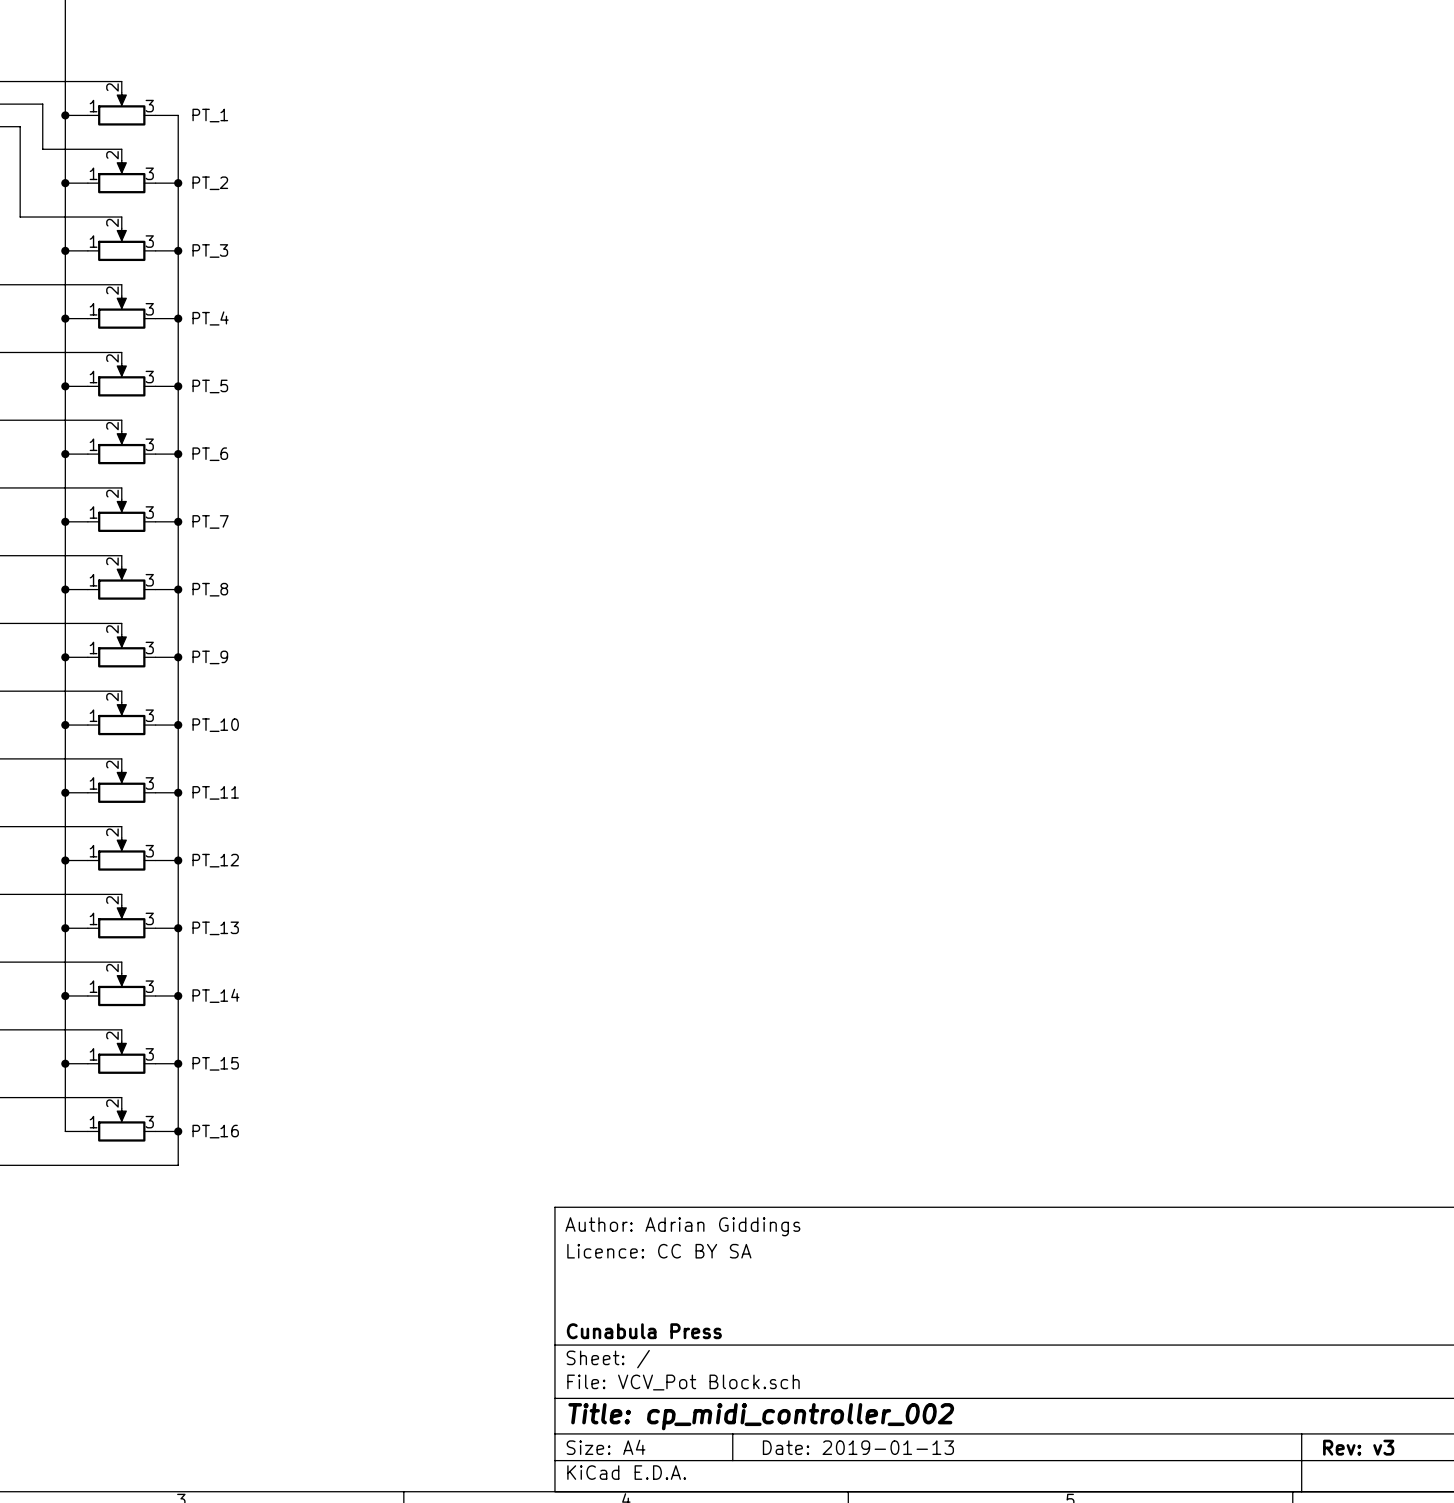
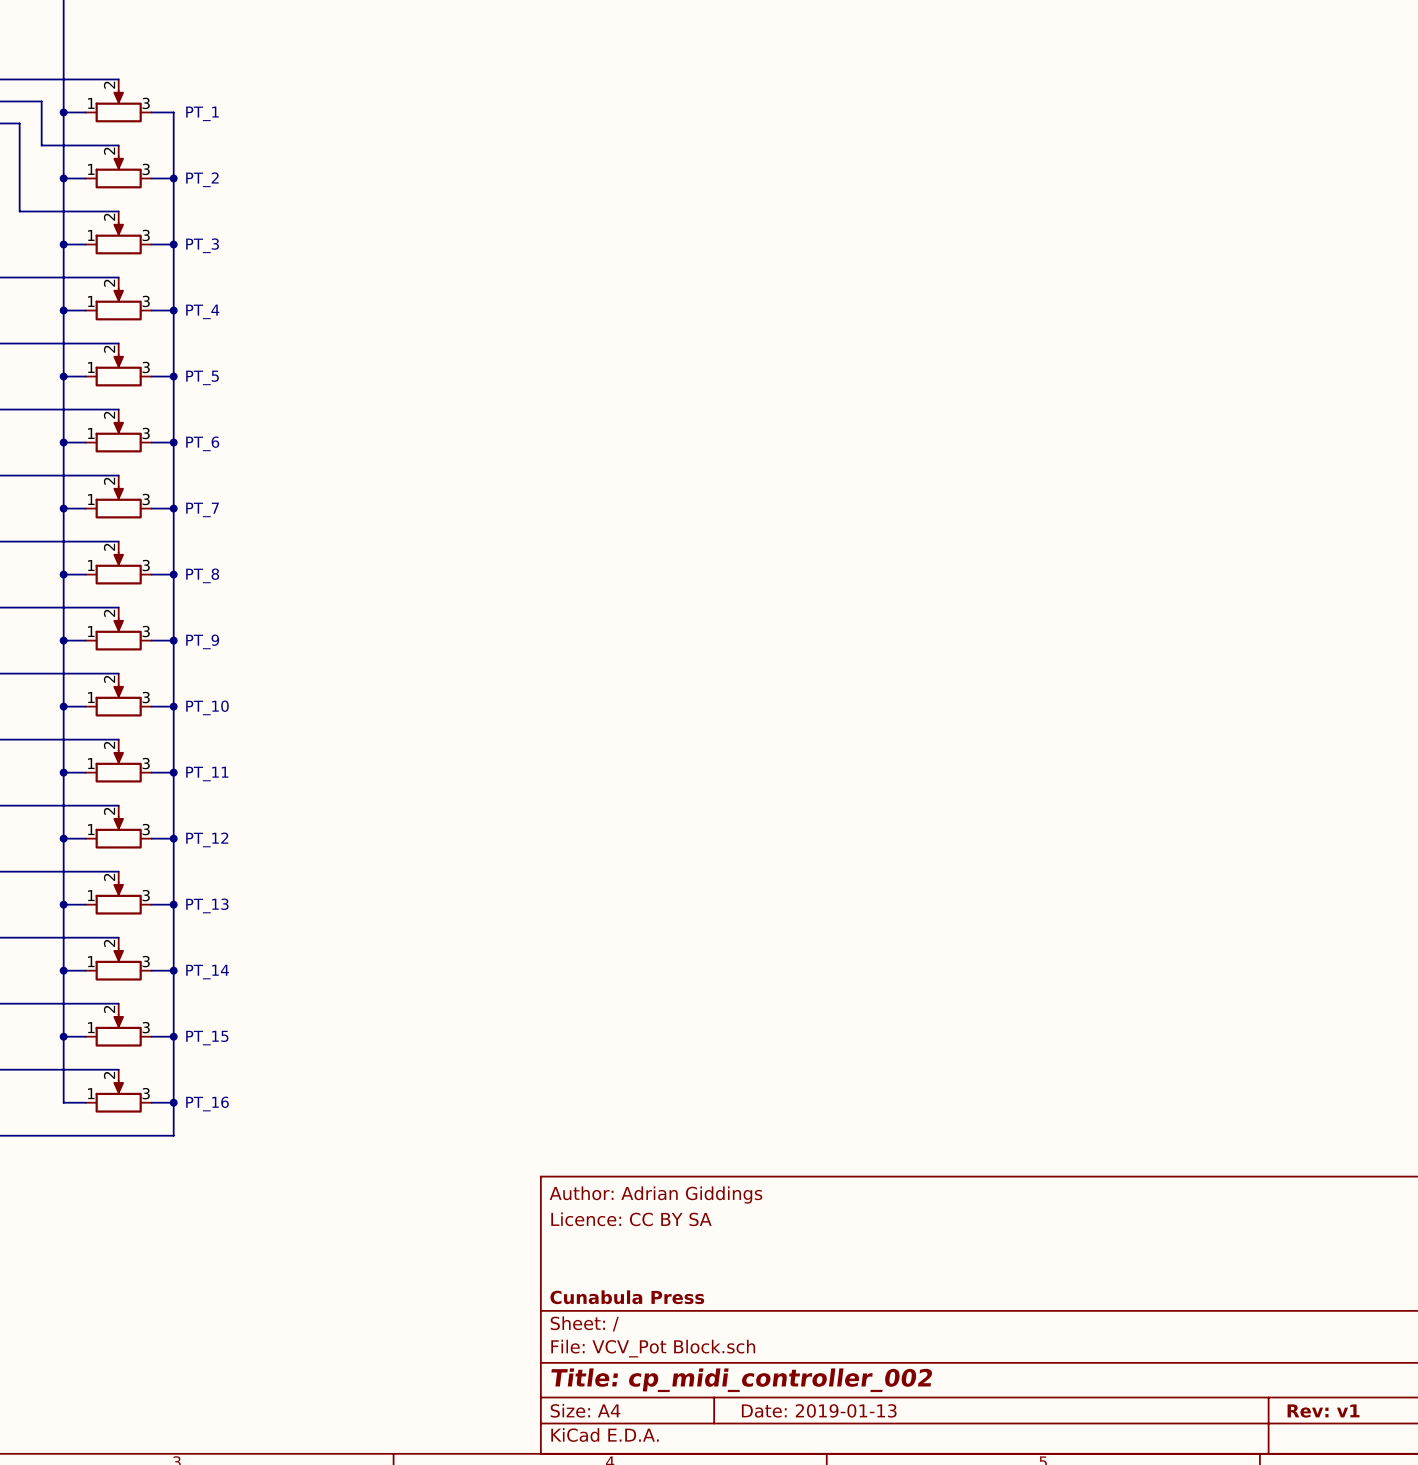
title block: Rev: v3 (1358, 1447) -> Rev: v1 (1323, 1411)

